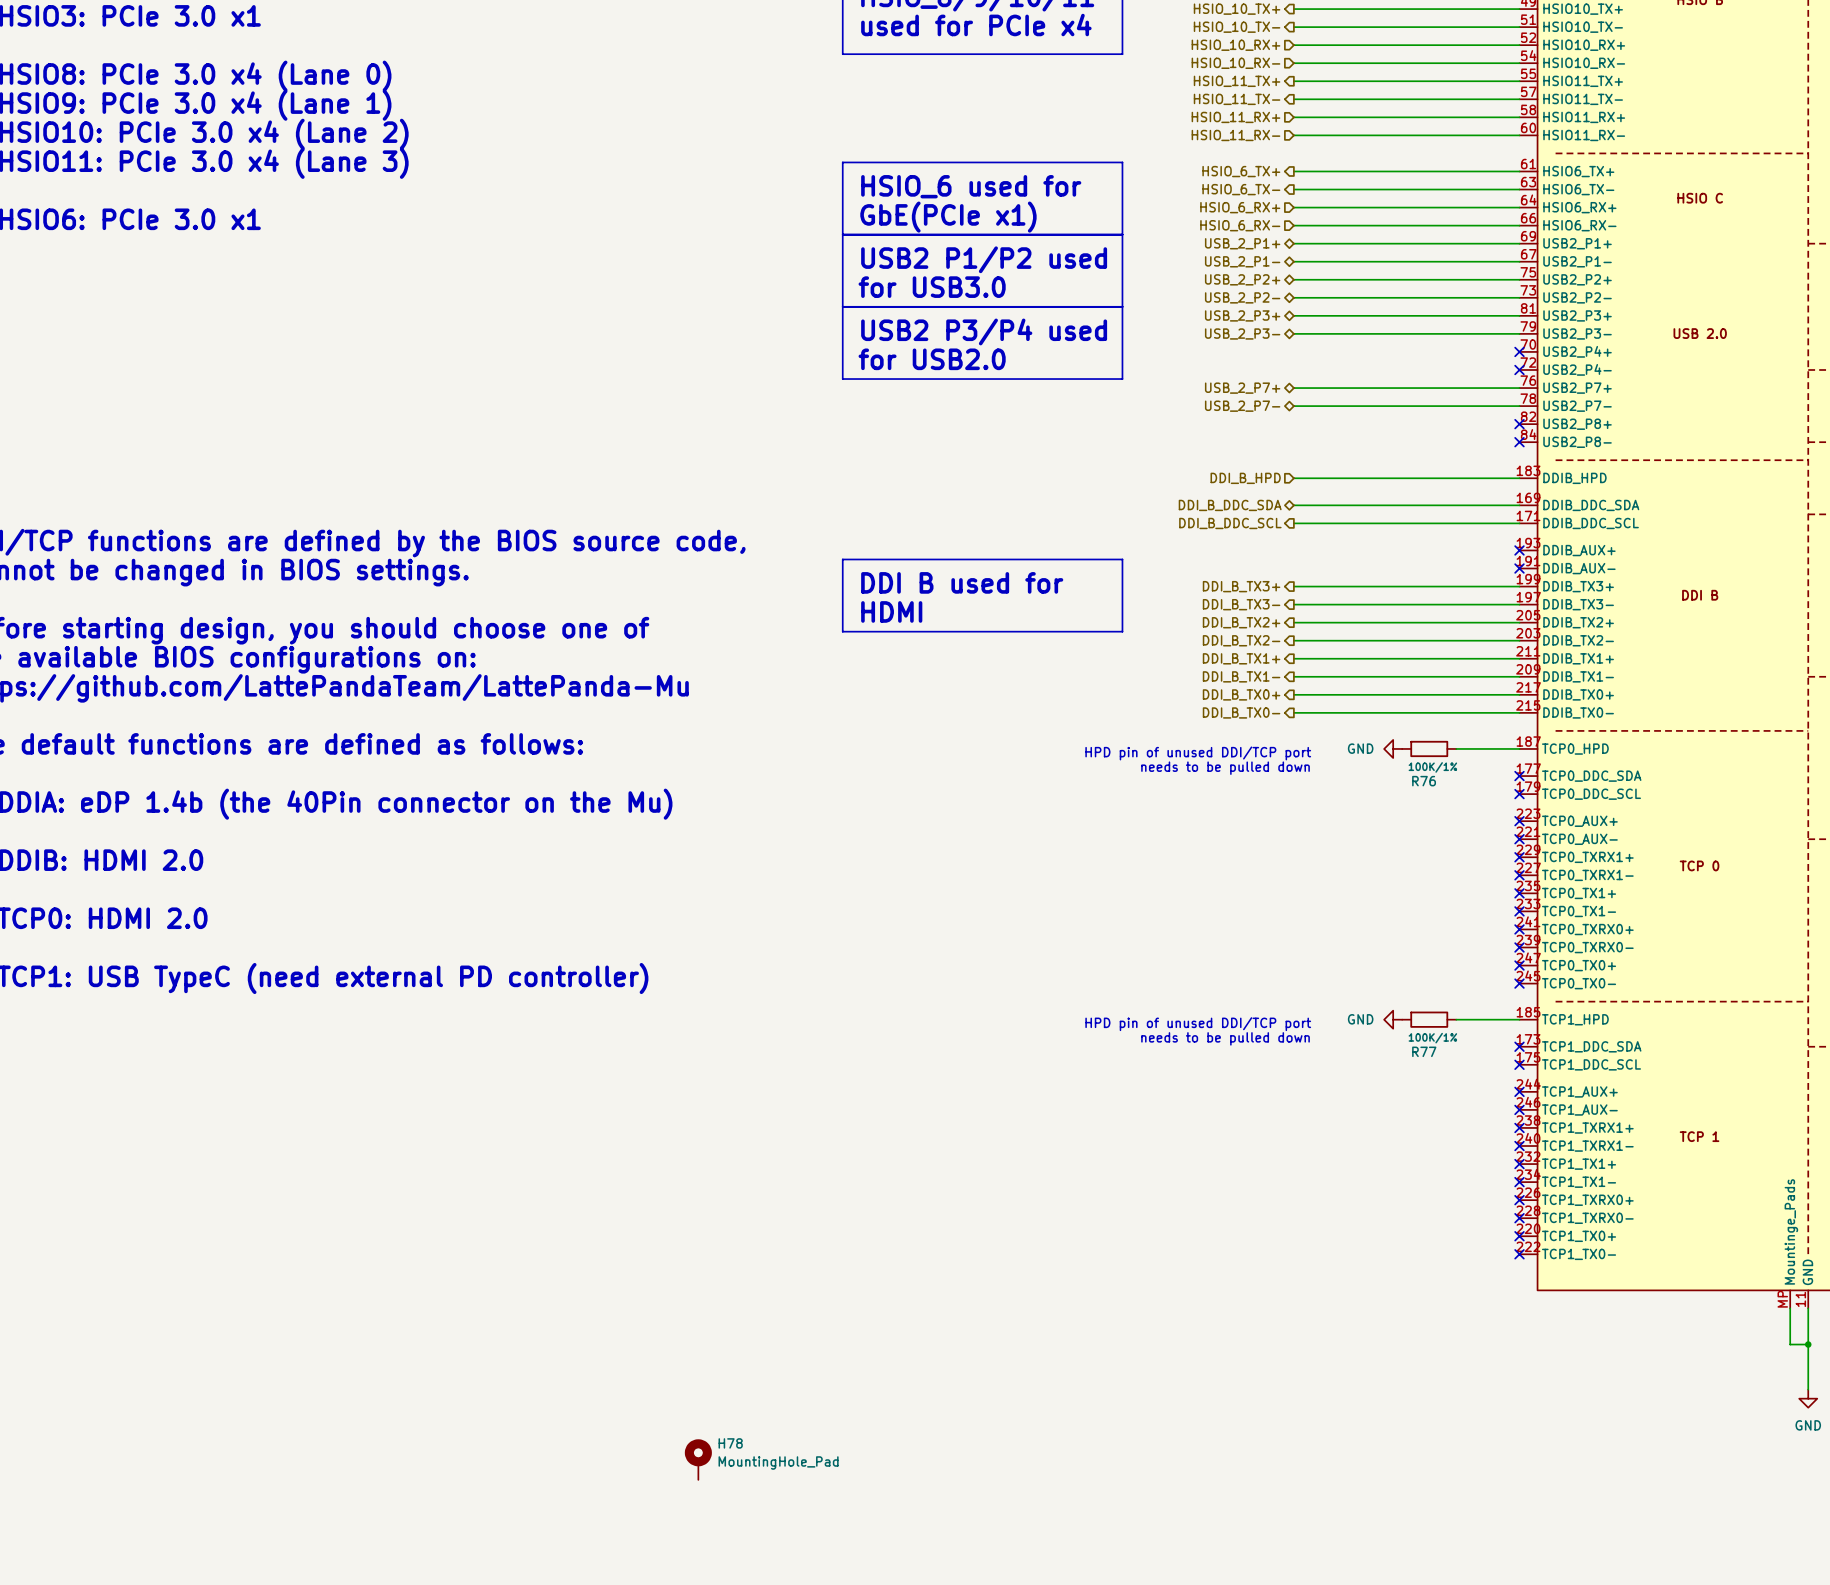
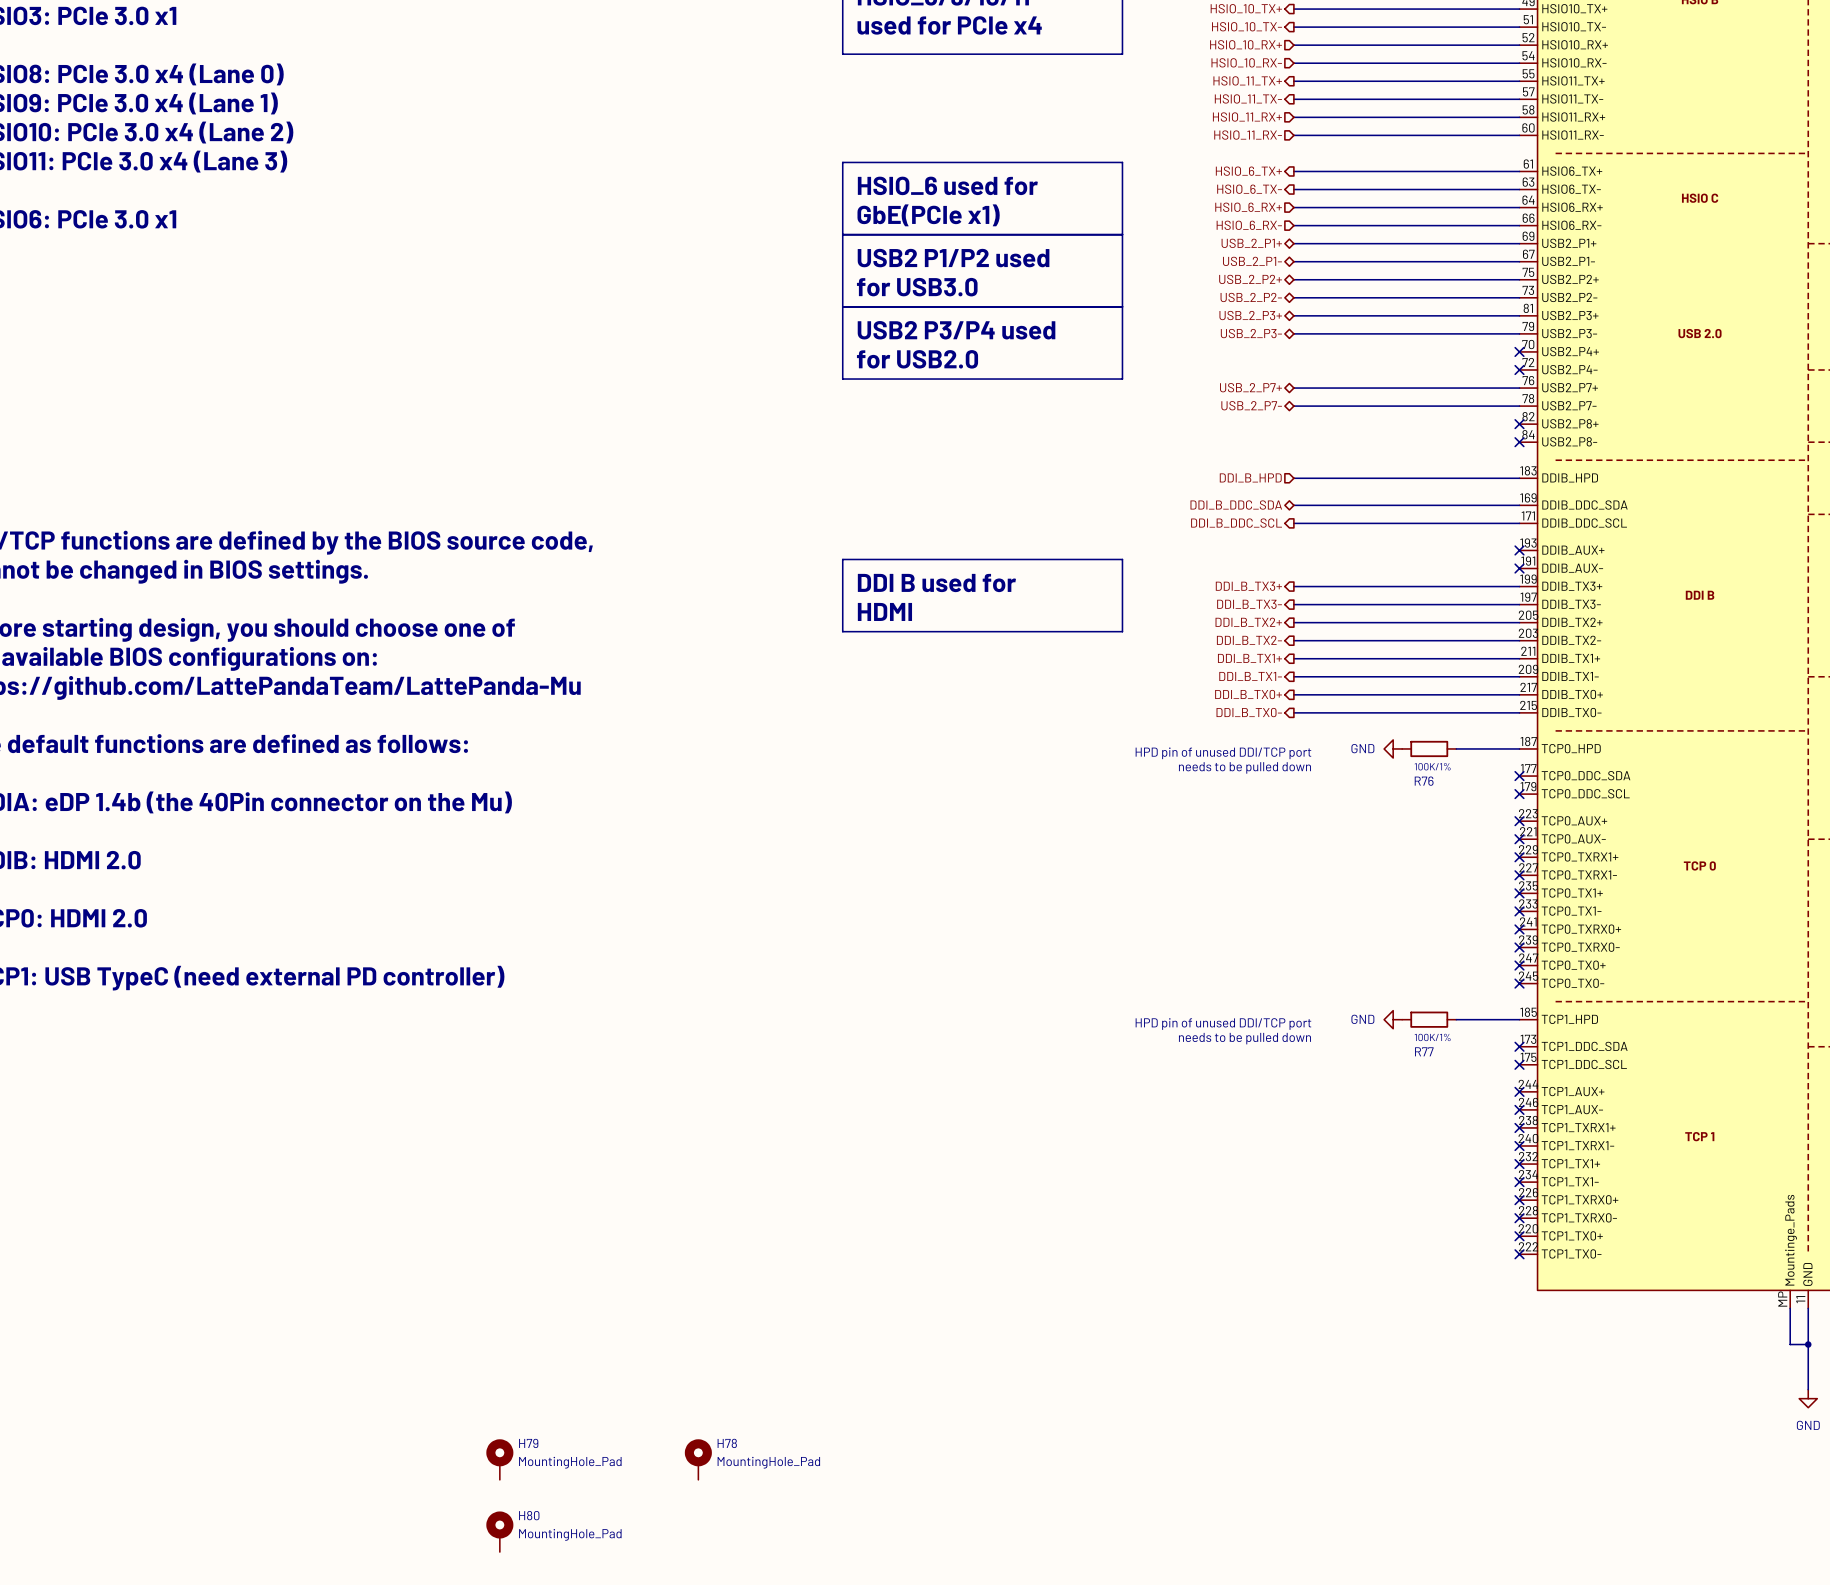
H79: none -> MountingHole_Pad (499, 1459)
H80: none -> MountingHole_Pad (499, 1531)

